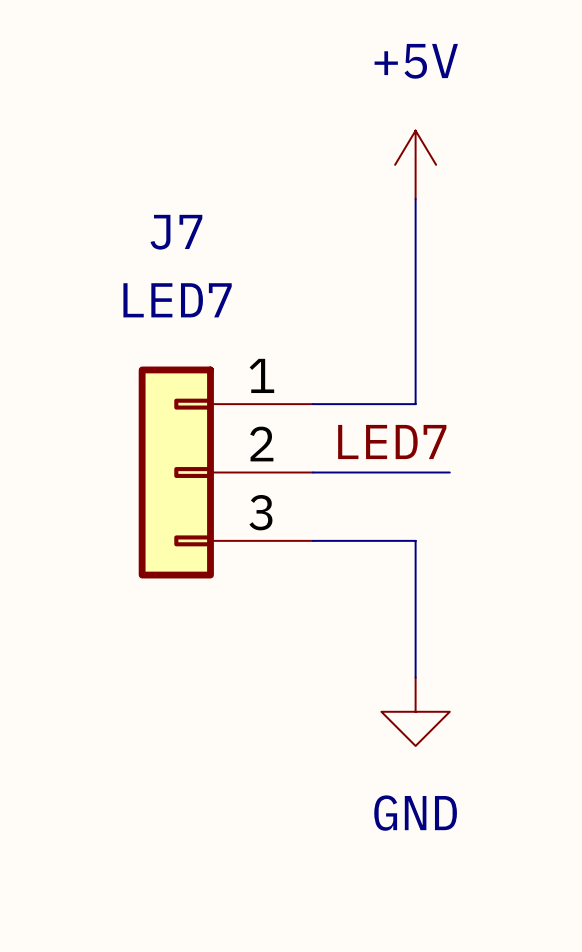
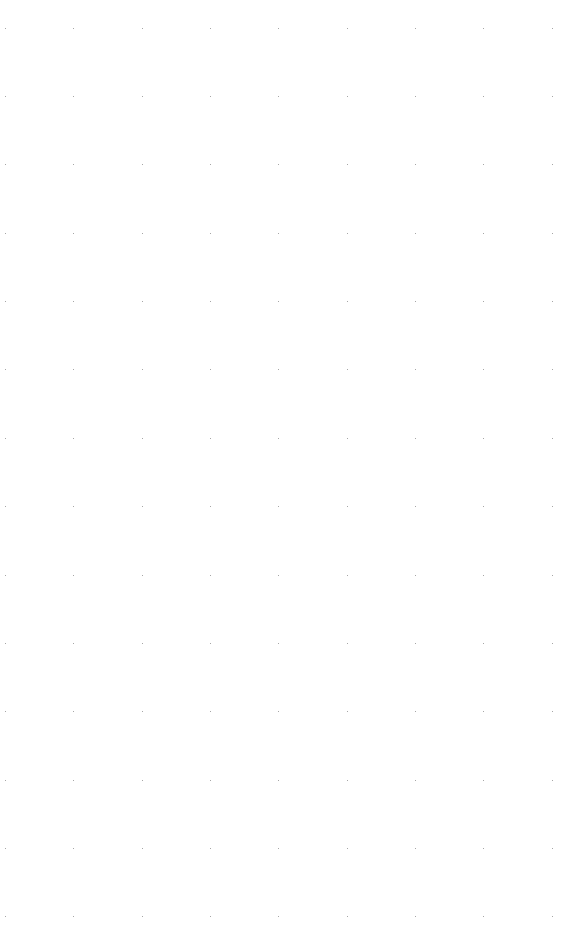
power symbol: +5V (415, 164) -> none
wire: (415, 199) (415, 404) (313, 404) -> none
label: LED7 (392, 442) -> none
J7: LED7 (225, 472) -> none
wire: (313, 472) (449, 472) -> none
wire: (313, 540) (415, 540) (415, 677) -> none
power symbol: GND (415, 711) -> none

